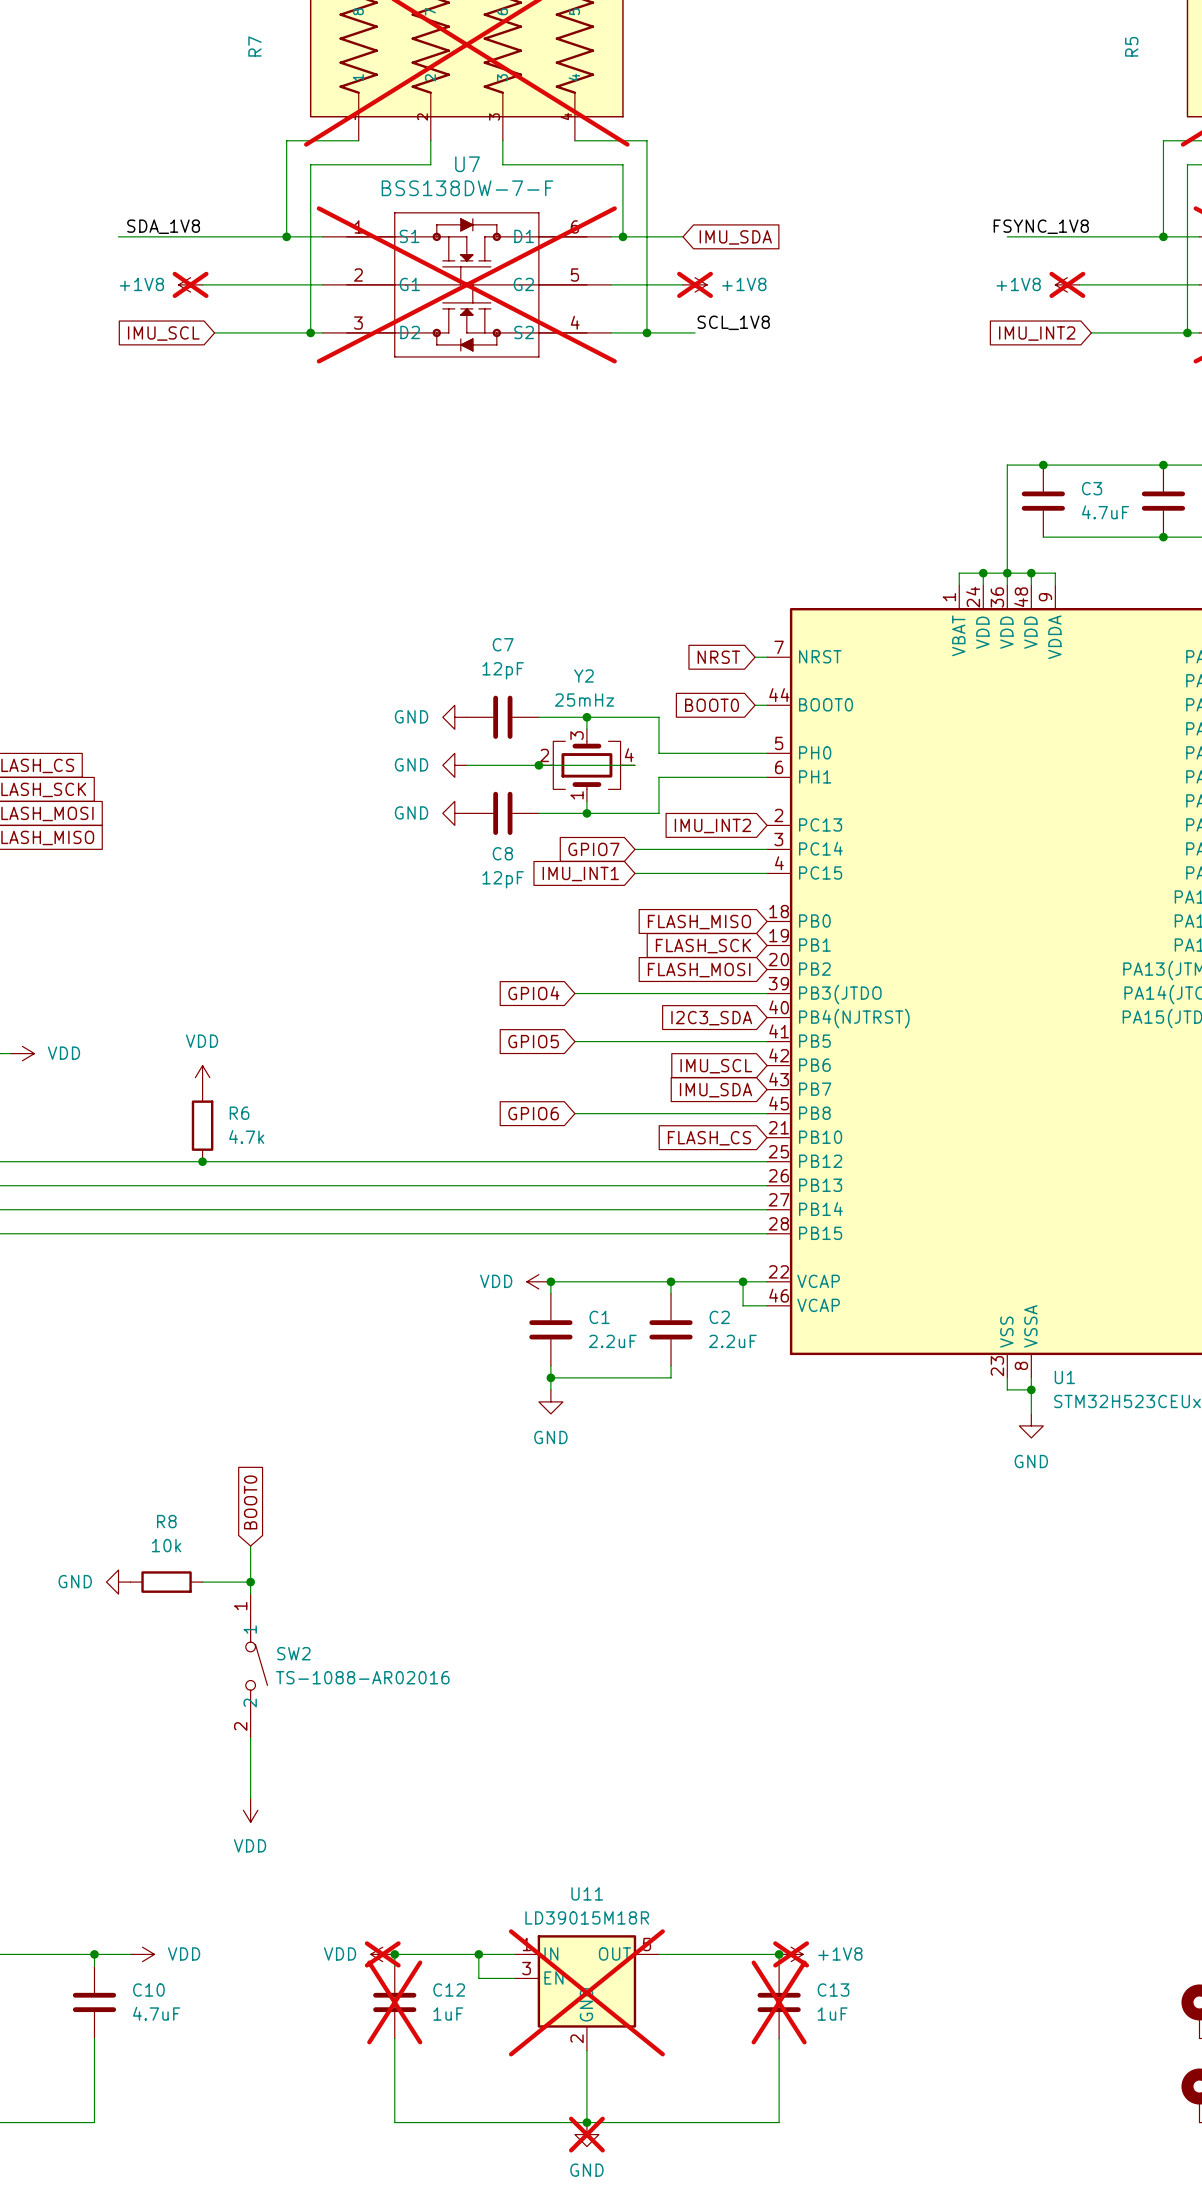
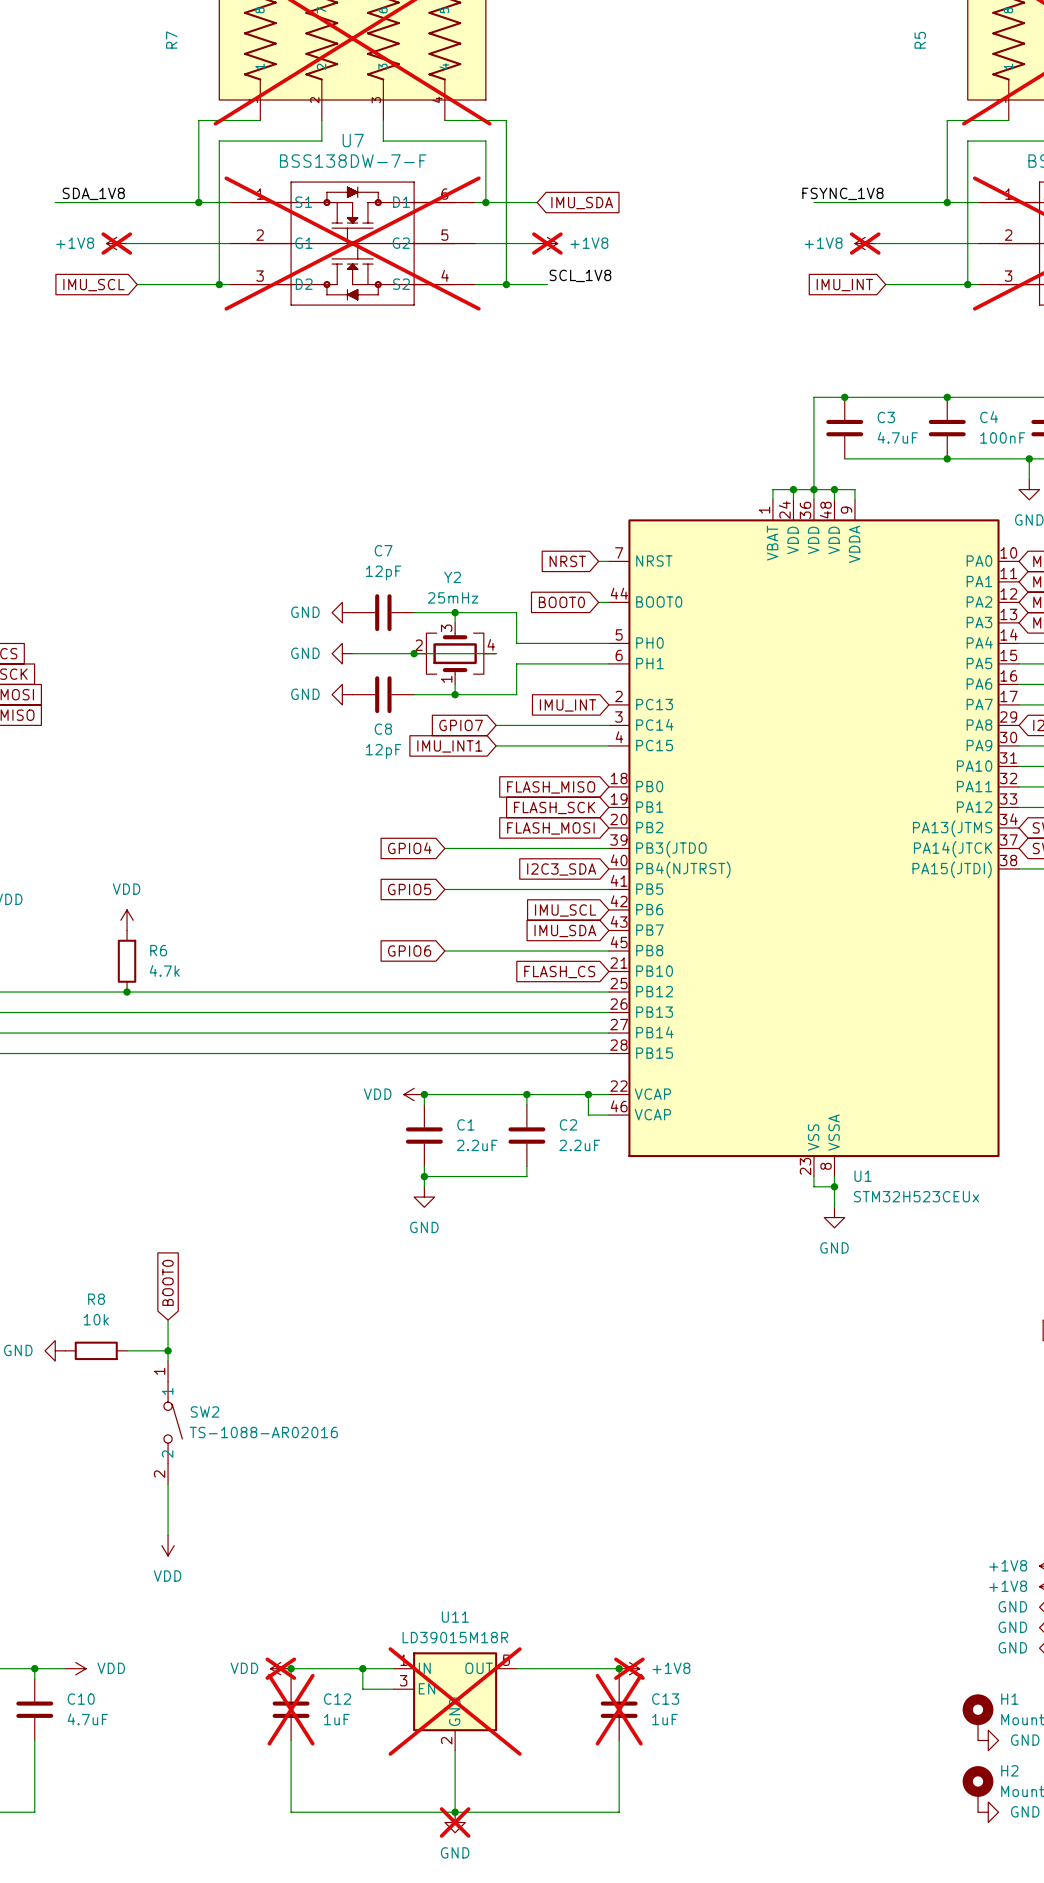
global label: IMU_INT2 (1037, 333) -> IMU_INT (844, 285)
global label: IMU_INT2 (712, 825) -> IMU_INT (568, 705)

